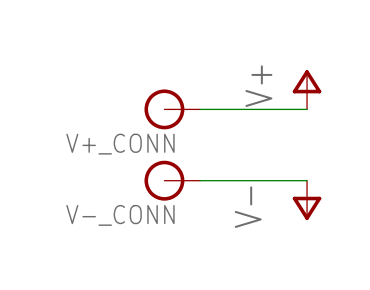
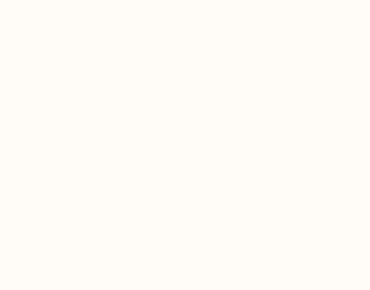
power symbol: V+ (307, 89) -> none
V+_CONN: (172, 109) -> none
wire: (200, 109) (307, 109) -> none
V-_CONN: (172, 180) -> none
wire: (200, 180) (307, 180) -> none
power symbol: V- (307, 200) -> none

